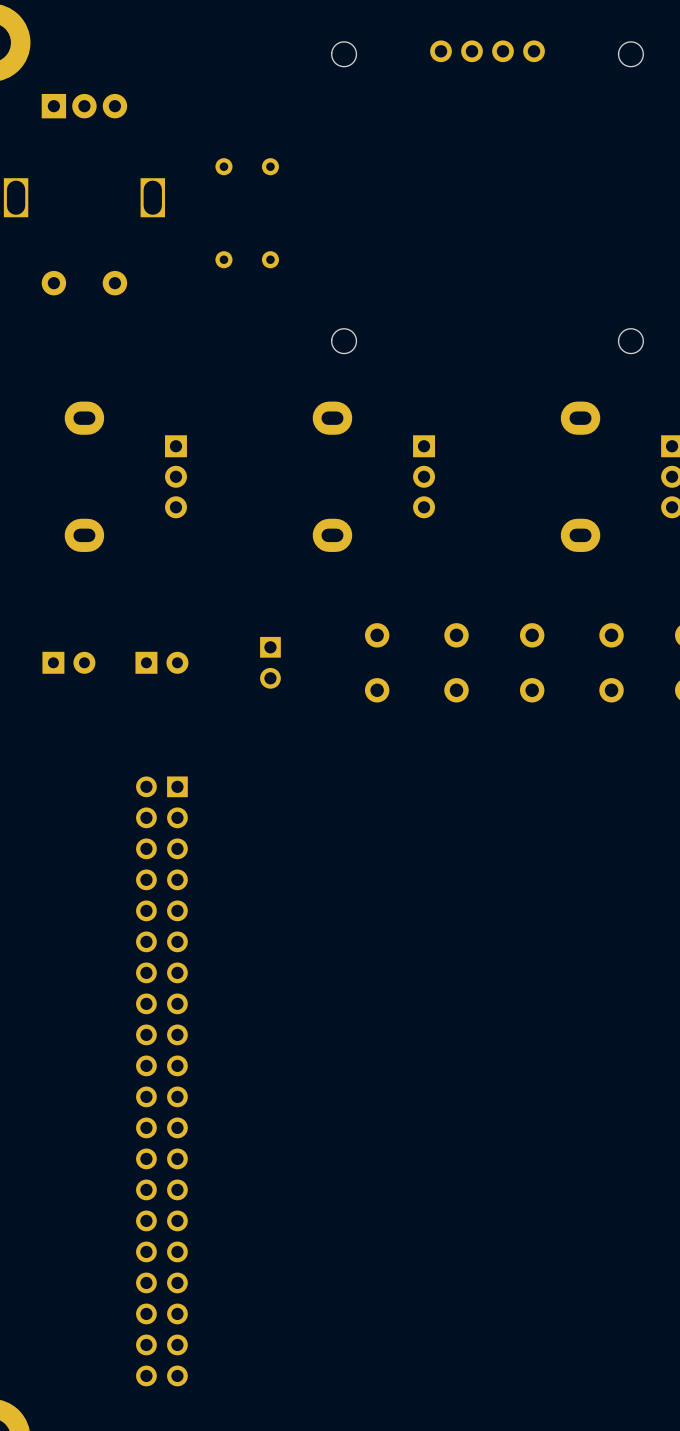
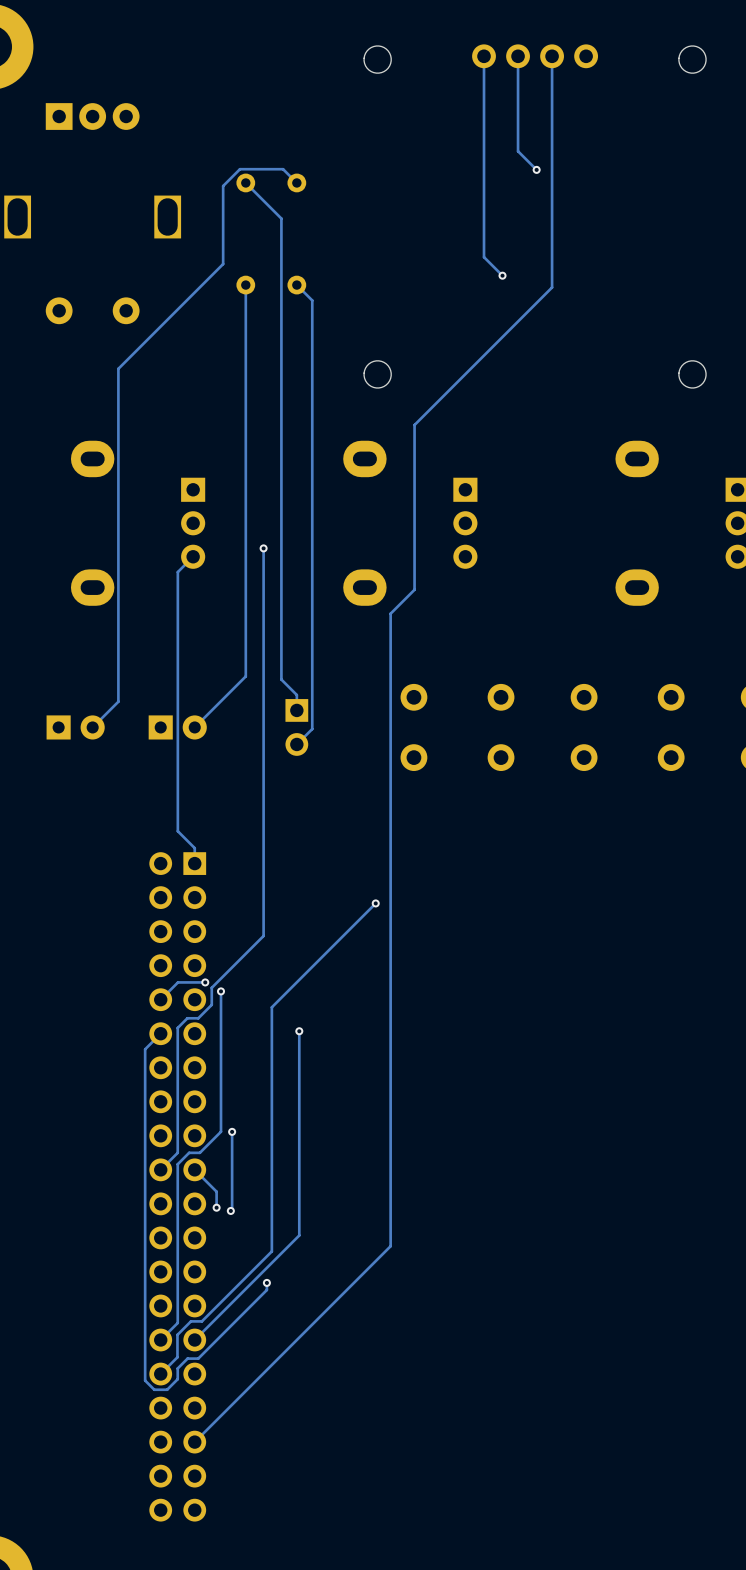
track: none -> (484, 56) (484, 257) (502, 275)
track: none -> (518, 56) (518, 151) (536, 169)
track: none -> (552, 56) (552, 287) (414, 425) (414, 589) (390, 613) (390, 1246) (194, 1442)
via: none -> (536, 169)
track: none -> (245, 182) (281, 218) (281, 679) (296, 695) (296, 710)
track: none -> (296, 182) (283, 169) (239, 169) (223, 186) (223, 264) (118, 368) (118, 701) (92, 727)
via: none -> (502, 275)
track: none -> (245, 285) (245, 676) (194, 727)
track: none -> (296, 285) (312, 300) (312, 729) (296, 744)
track: none -> (263, 548) (263, 935) (211, 987) (211, 1004) (198, 1018) (187, 1018) (177, 1027) (177, 1152) (160, 1169)
via: none -> (263, 548)
track: none -> (193, 556) (177, 572) (177, 831) (194, 848) (194, 863)
track: none -> (375, 903) (271, 1007) (271, 1251) (201, 1321) (190, 1321) (177, 1334) (177, 1357) (160, 1374)
via: none -> (375, 903)
track: none -> (205, 982) (177, 982) (160, 999)
via: none -> (205, 982)
track: none -> (221, 991) (221, 1131) (199, 1152) (189, 1152) (177, 1164) (177, 1322) (160, 1340)
via: none -> (221, 991)
track: none -> (299, 1031) (299, 1235) (194, 1340)
via: none -> (299, 1031)
track: none -> (160, 1033) (145, 1049) (145, 1380) (154, 1389) (167, 1389) (177, 1379) (177, 1368) (187, 1358) (198, 1358) (266, 1289) (266, 1282)
track: none -> (232, 1131) (230, 1210)
via: none -> (232, 1131)
track: none -> (194, 1169) (216, 1191) (216, 1207)
via: none -> (216, 1207)
via: none -> (230, 1210)
via: none -> (266, 1282)

